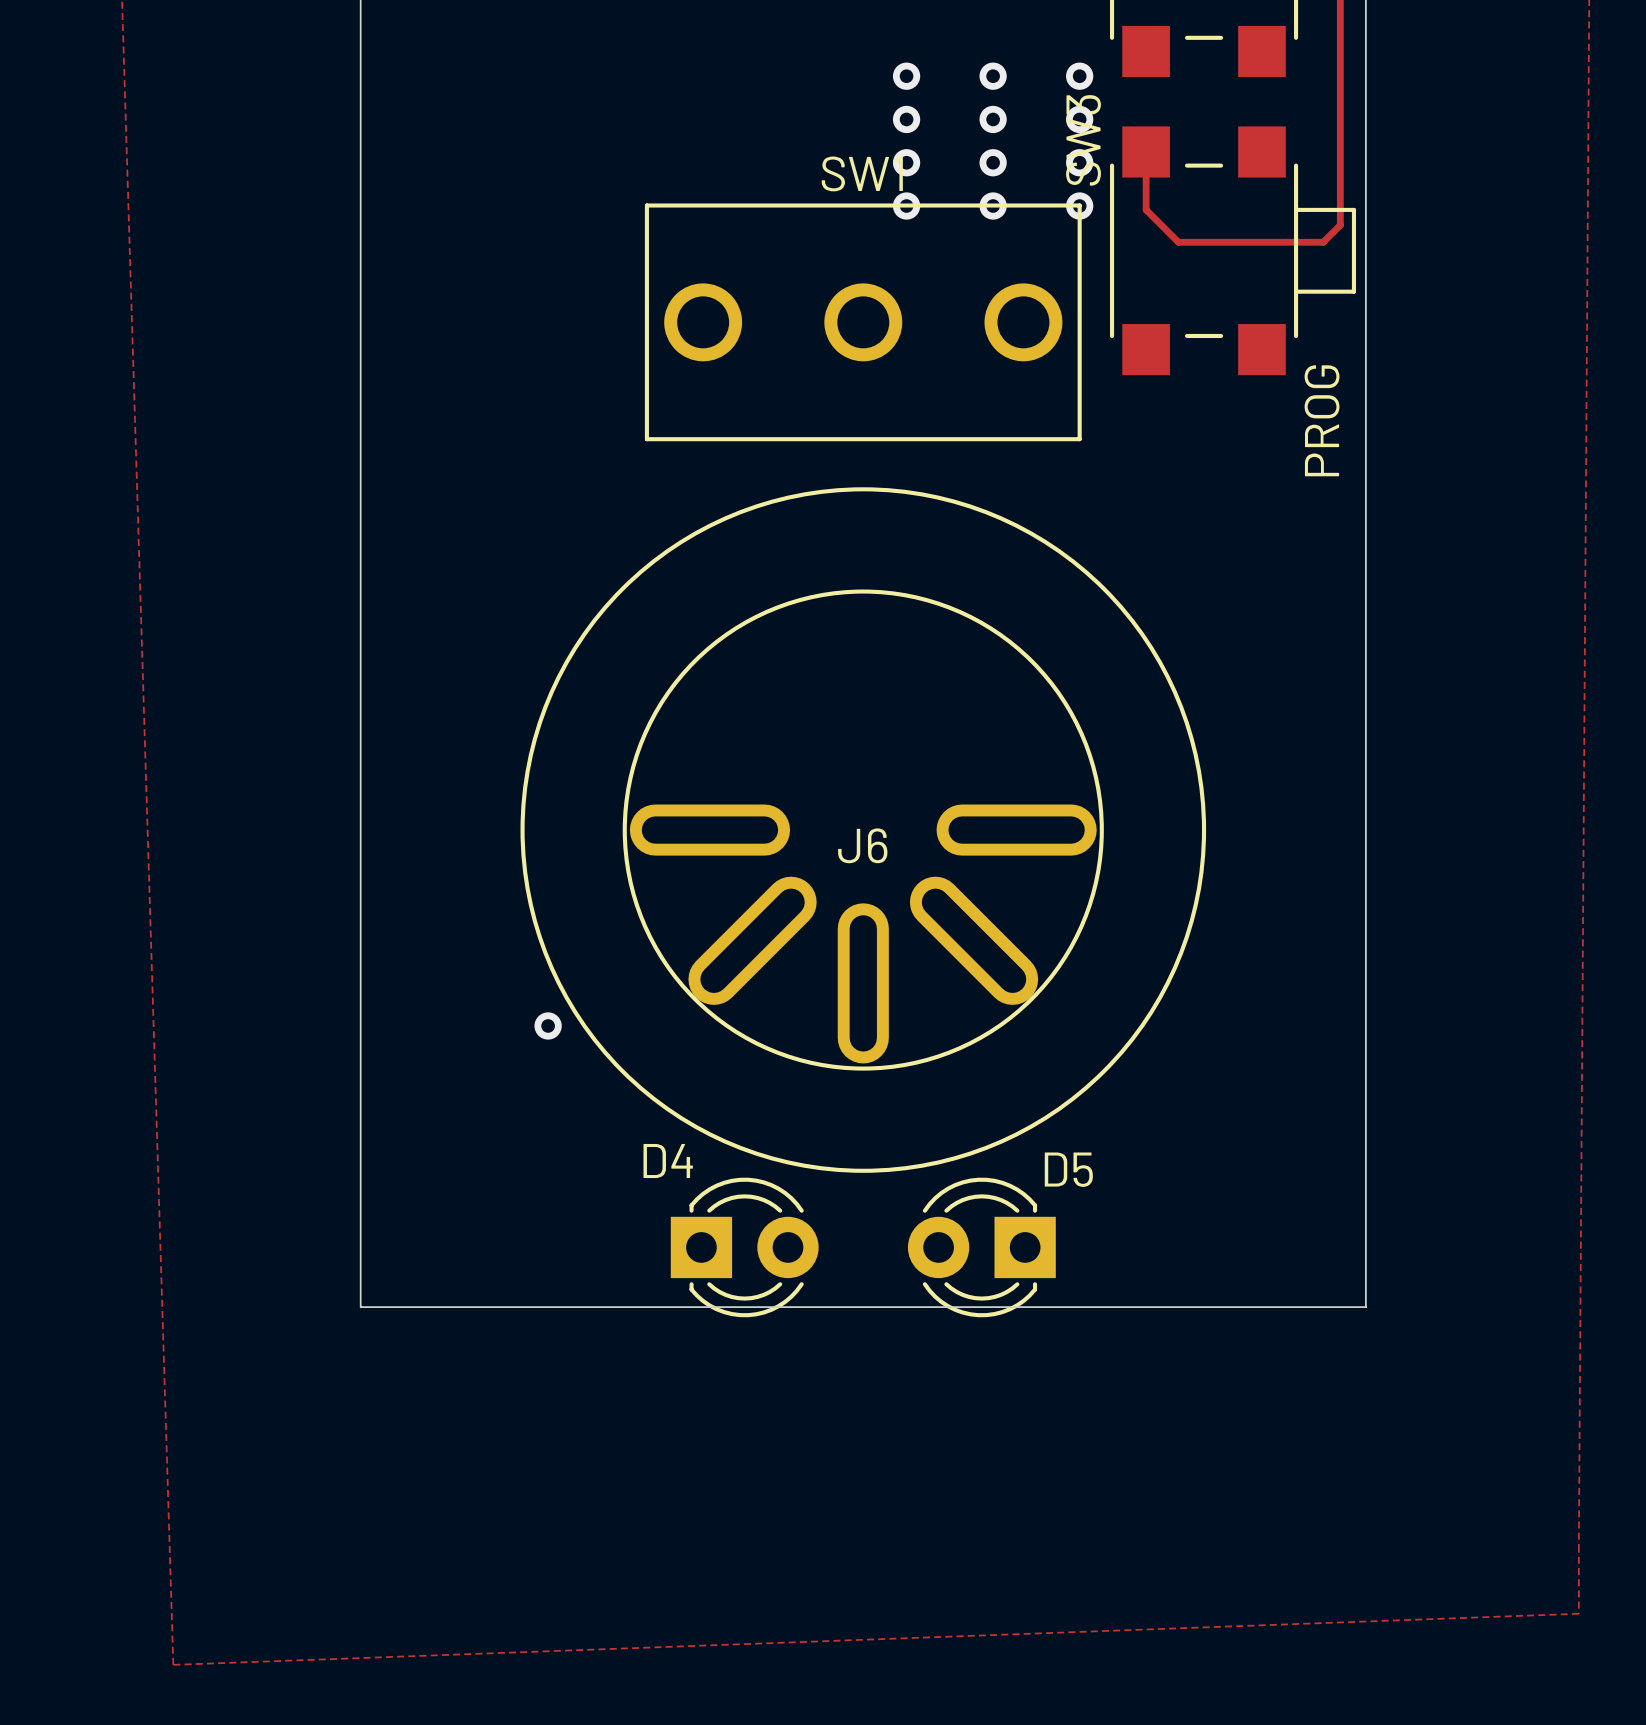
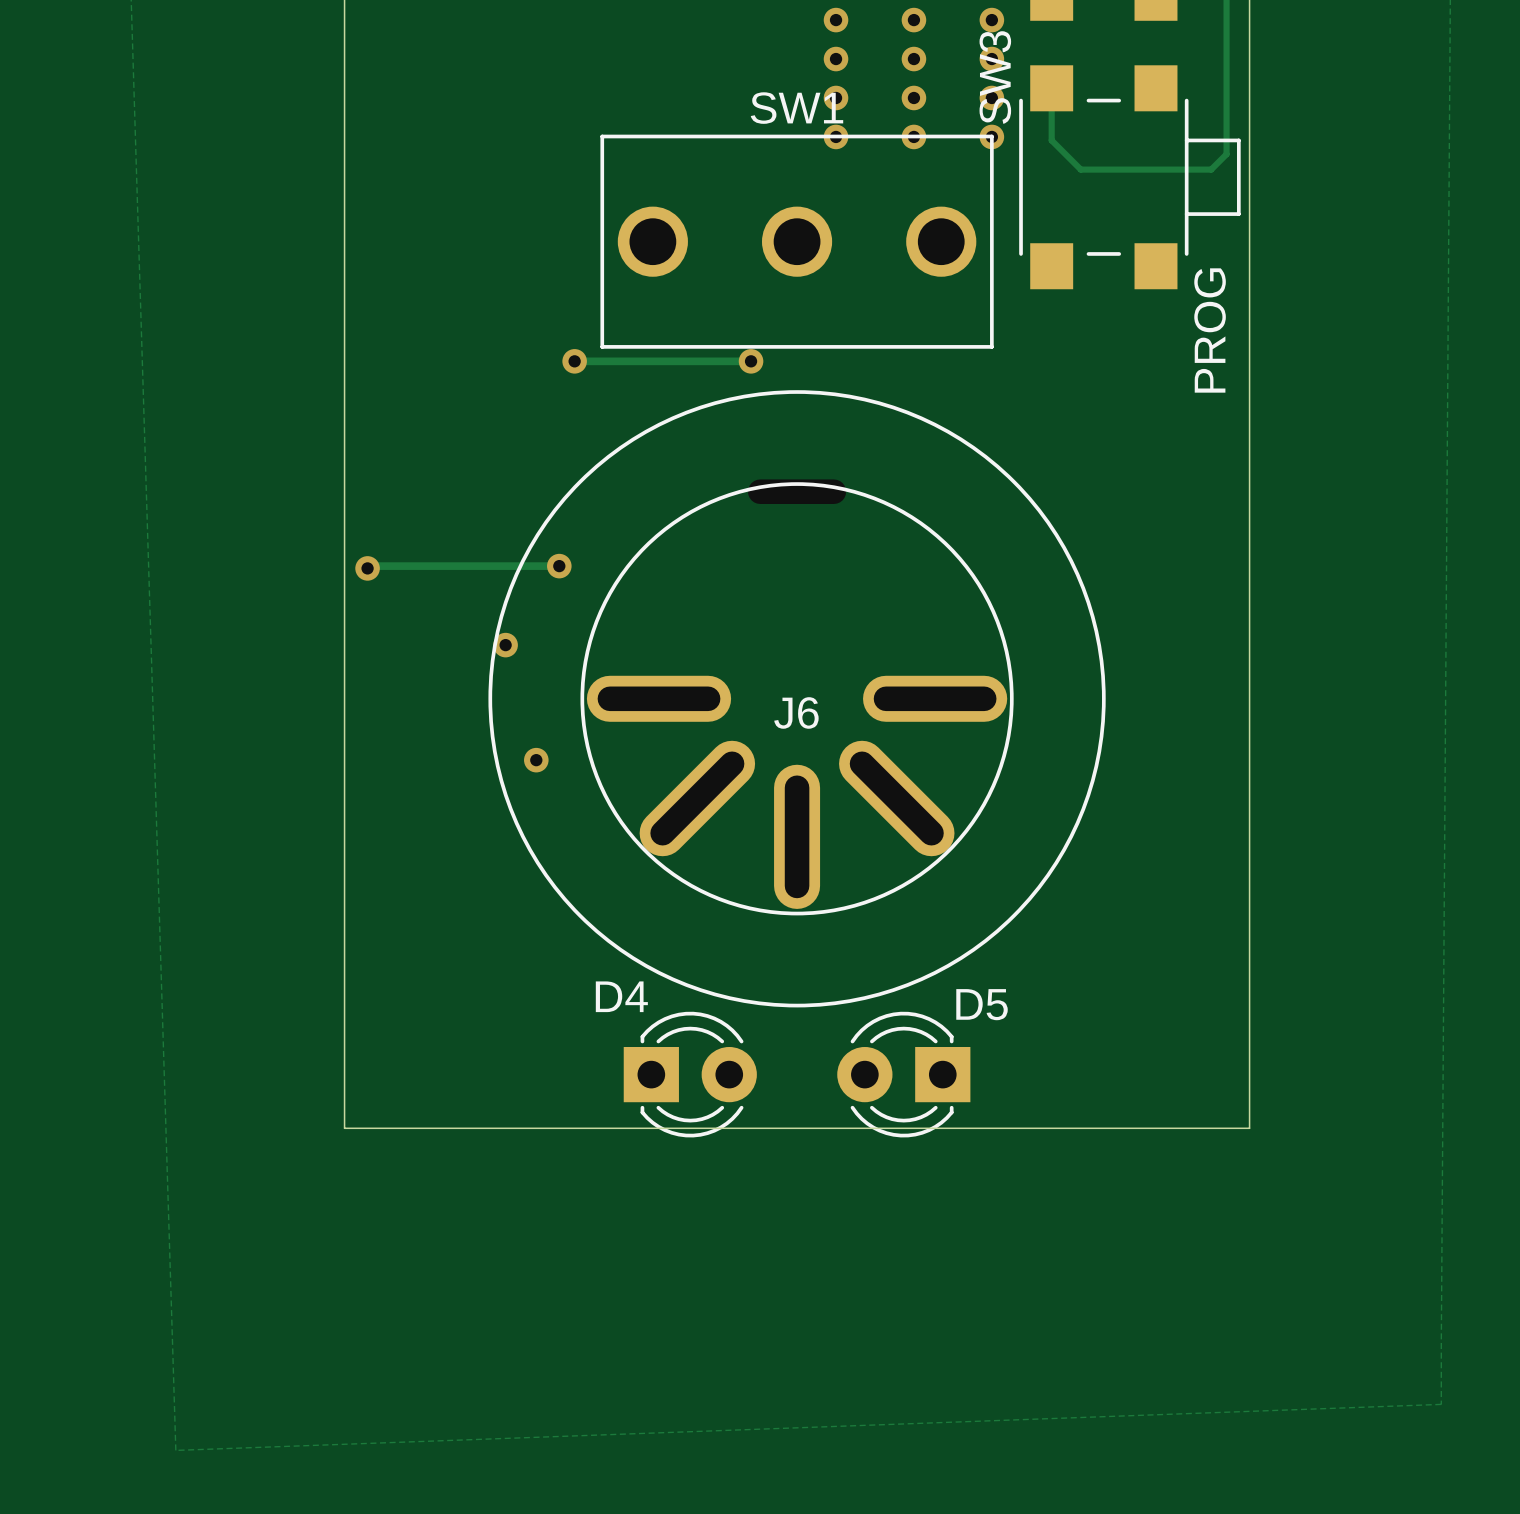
track: none -> (574, 361) (751, 361)
via: none -> (574, 361)
via: none -> (751, 361)
track: none -> (559, 566) (369, 566) (367, 568)
via: none -> (559, 566)
via: none -> (367, 568)
via: none -> (505, 645)
via: none -> (536, 760)
via: (548, 1025) -> none

